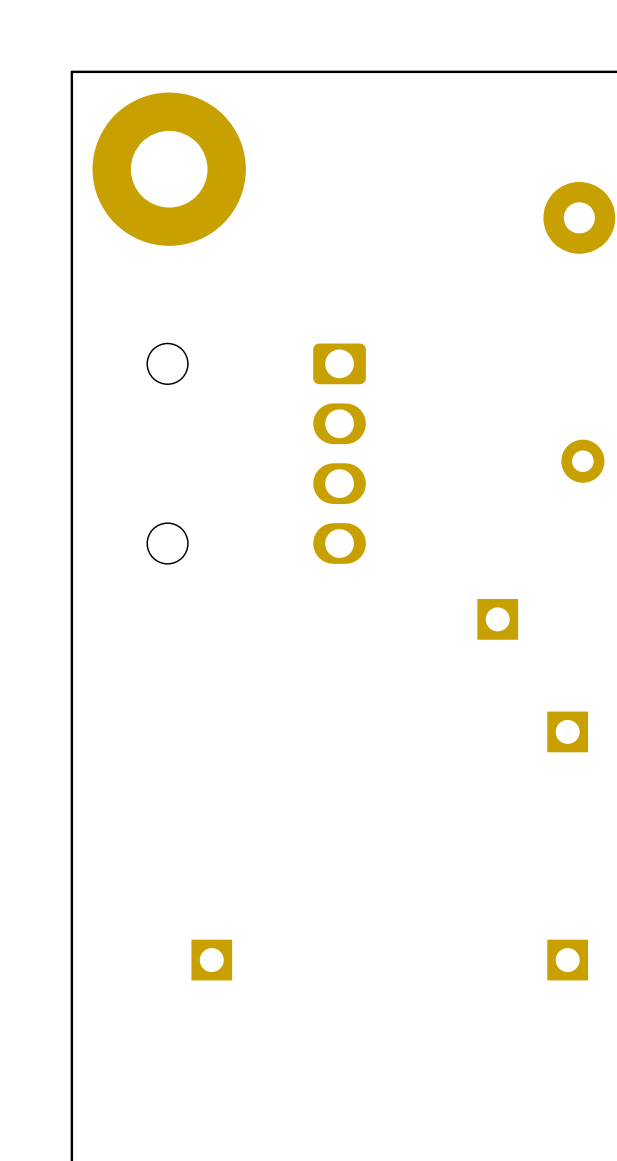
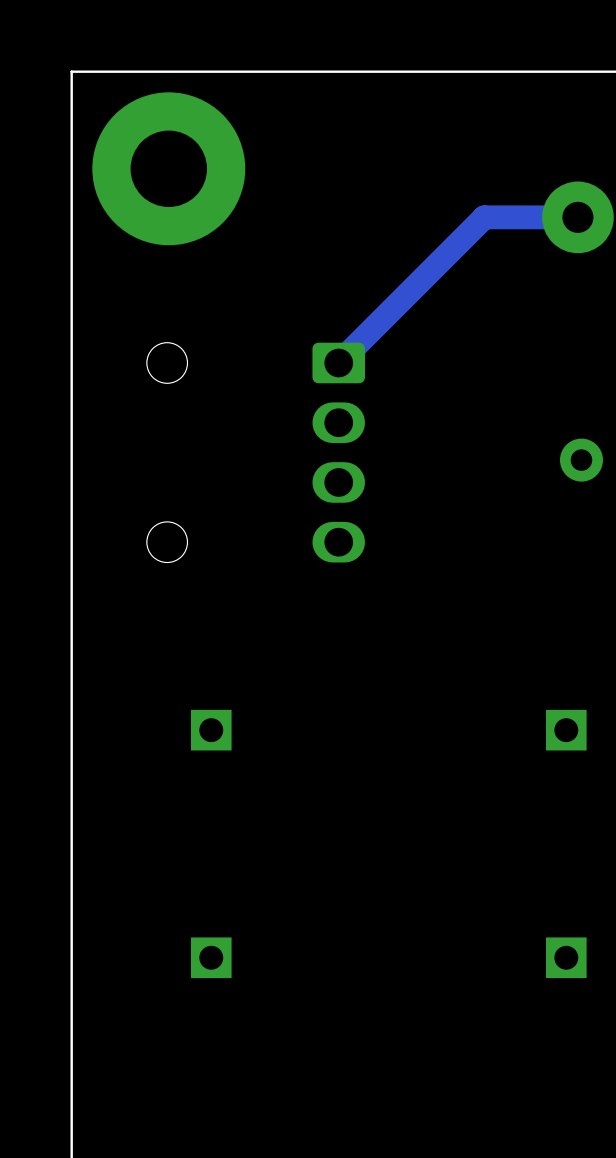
bottom track: none -> (577, 217) (484, 217) (338, 363)
part position: (497, 619) -> (211, 730)

